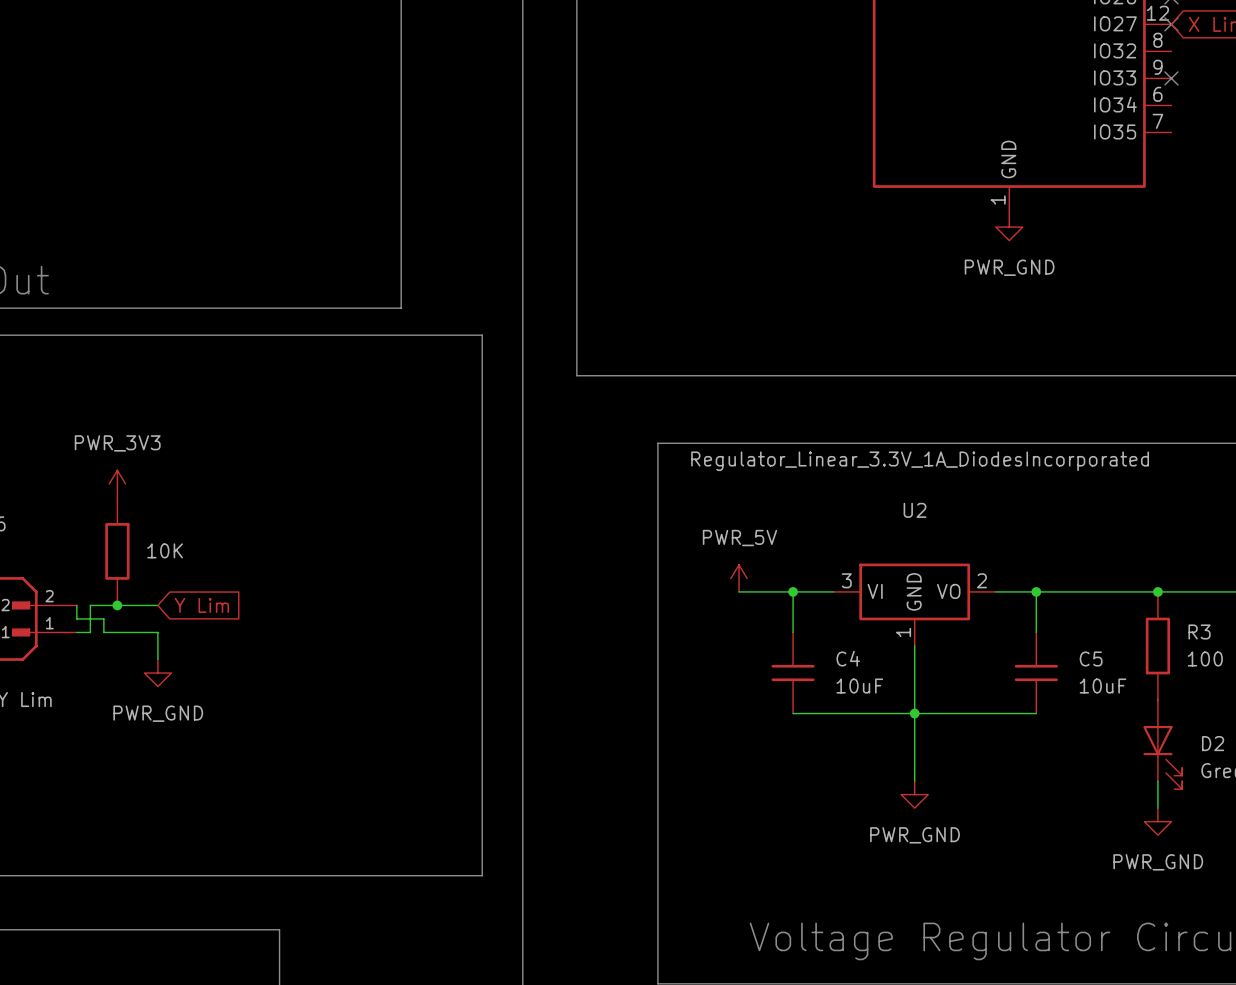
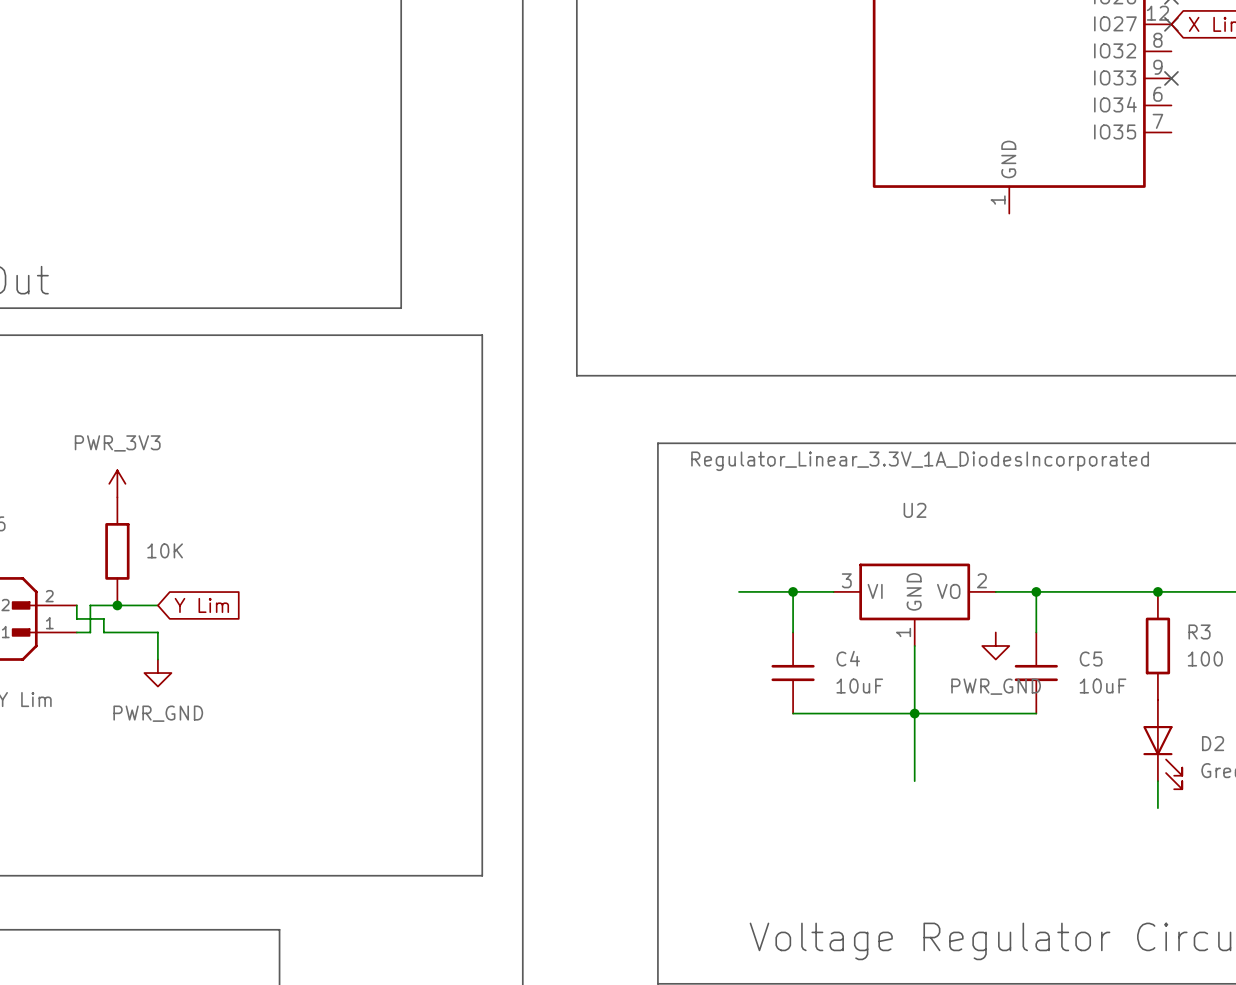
power symbol: PWR_GND (1009, 227) -> none
power symbol: PWR_5V (739, 578) -> none
power symbol: none -> PWR_GND (995, 645)
power symbol: PWR_GND (914, 794) -> none
power symbol: PWR_GND (1157, 821) -> none

